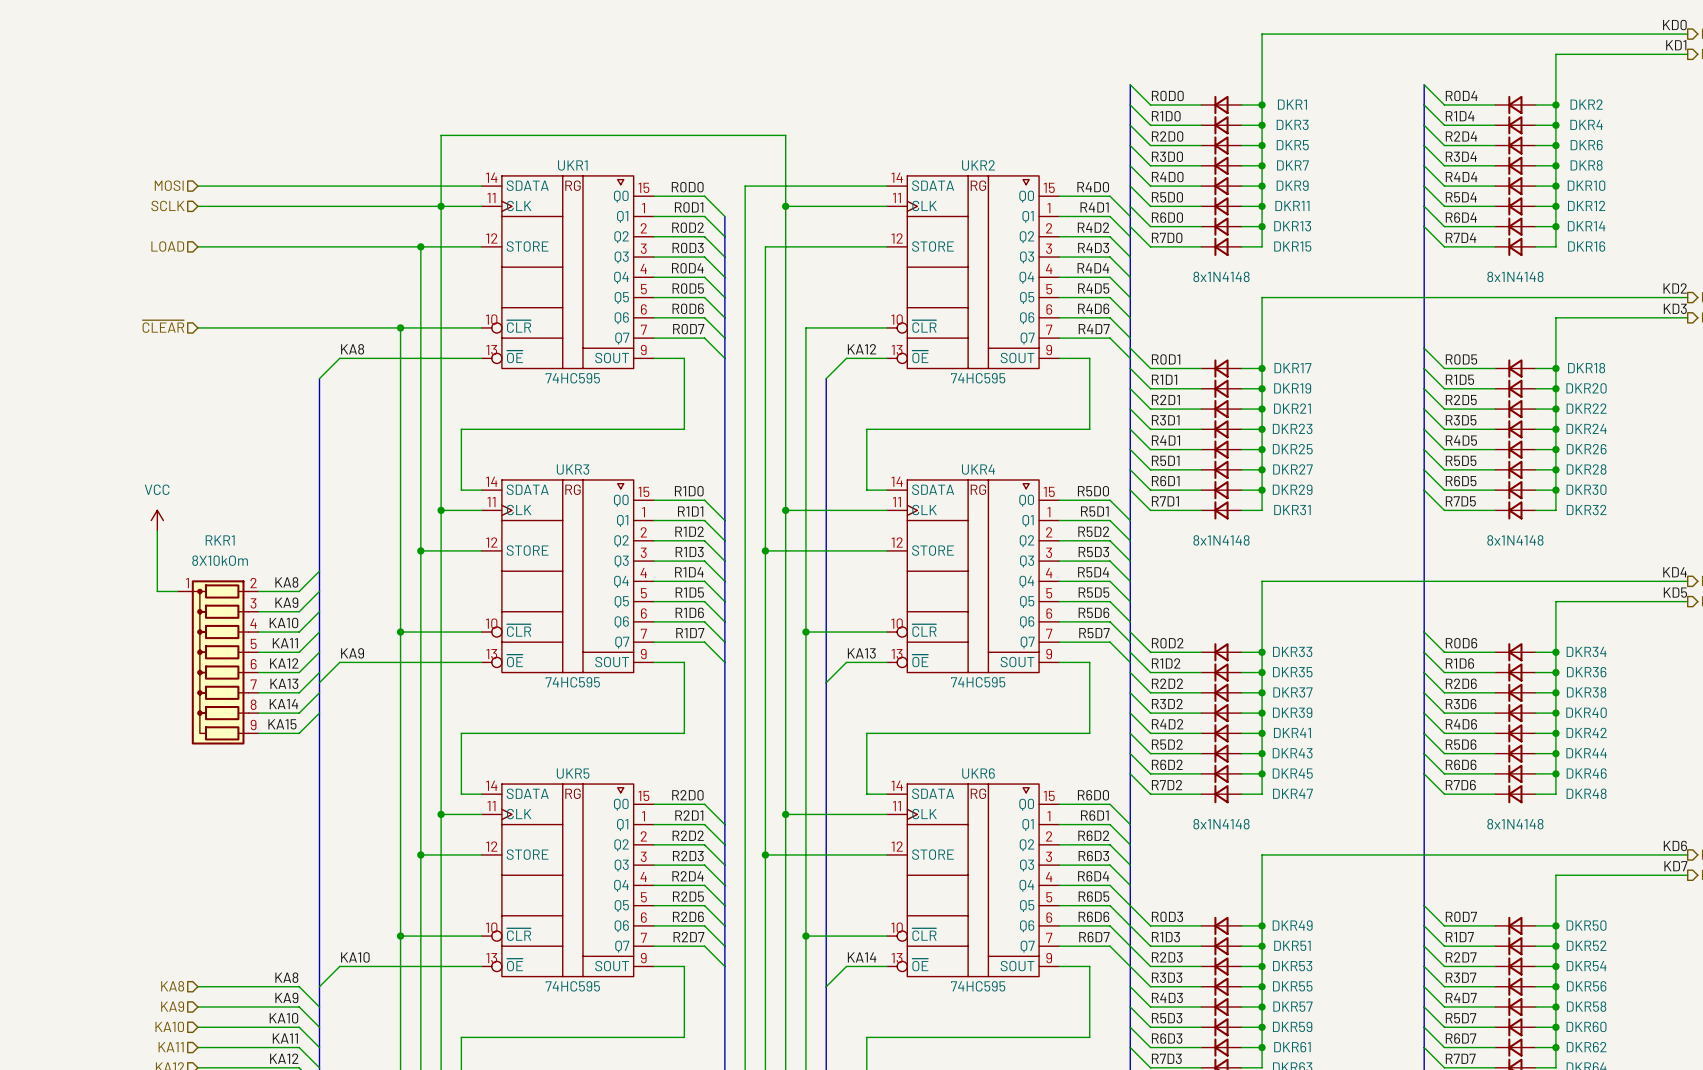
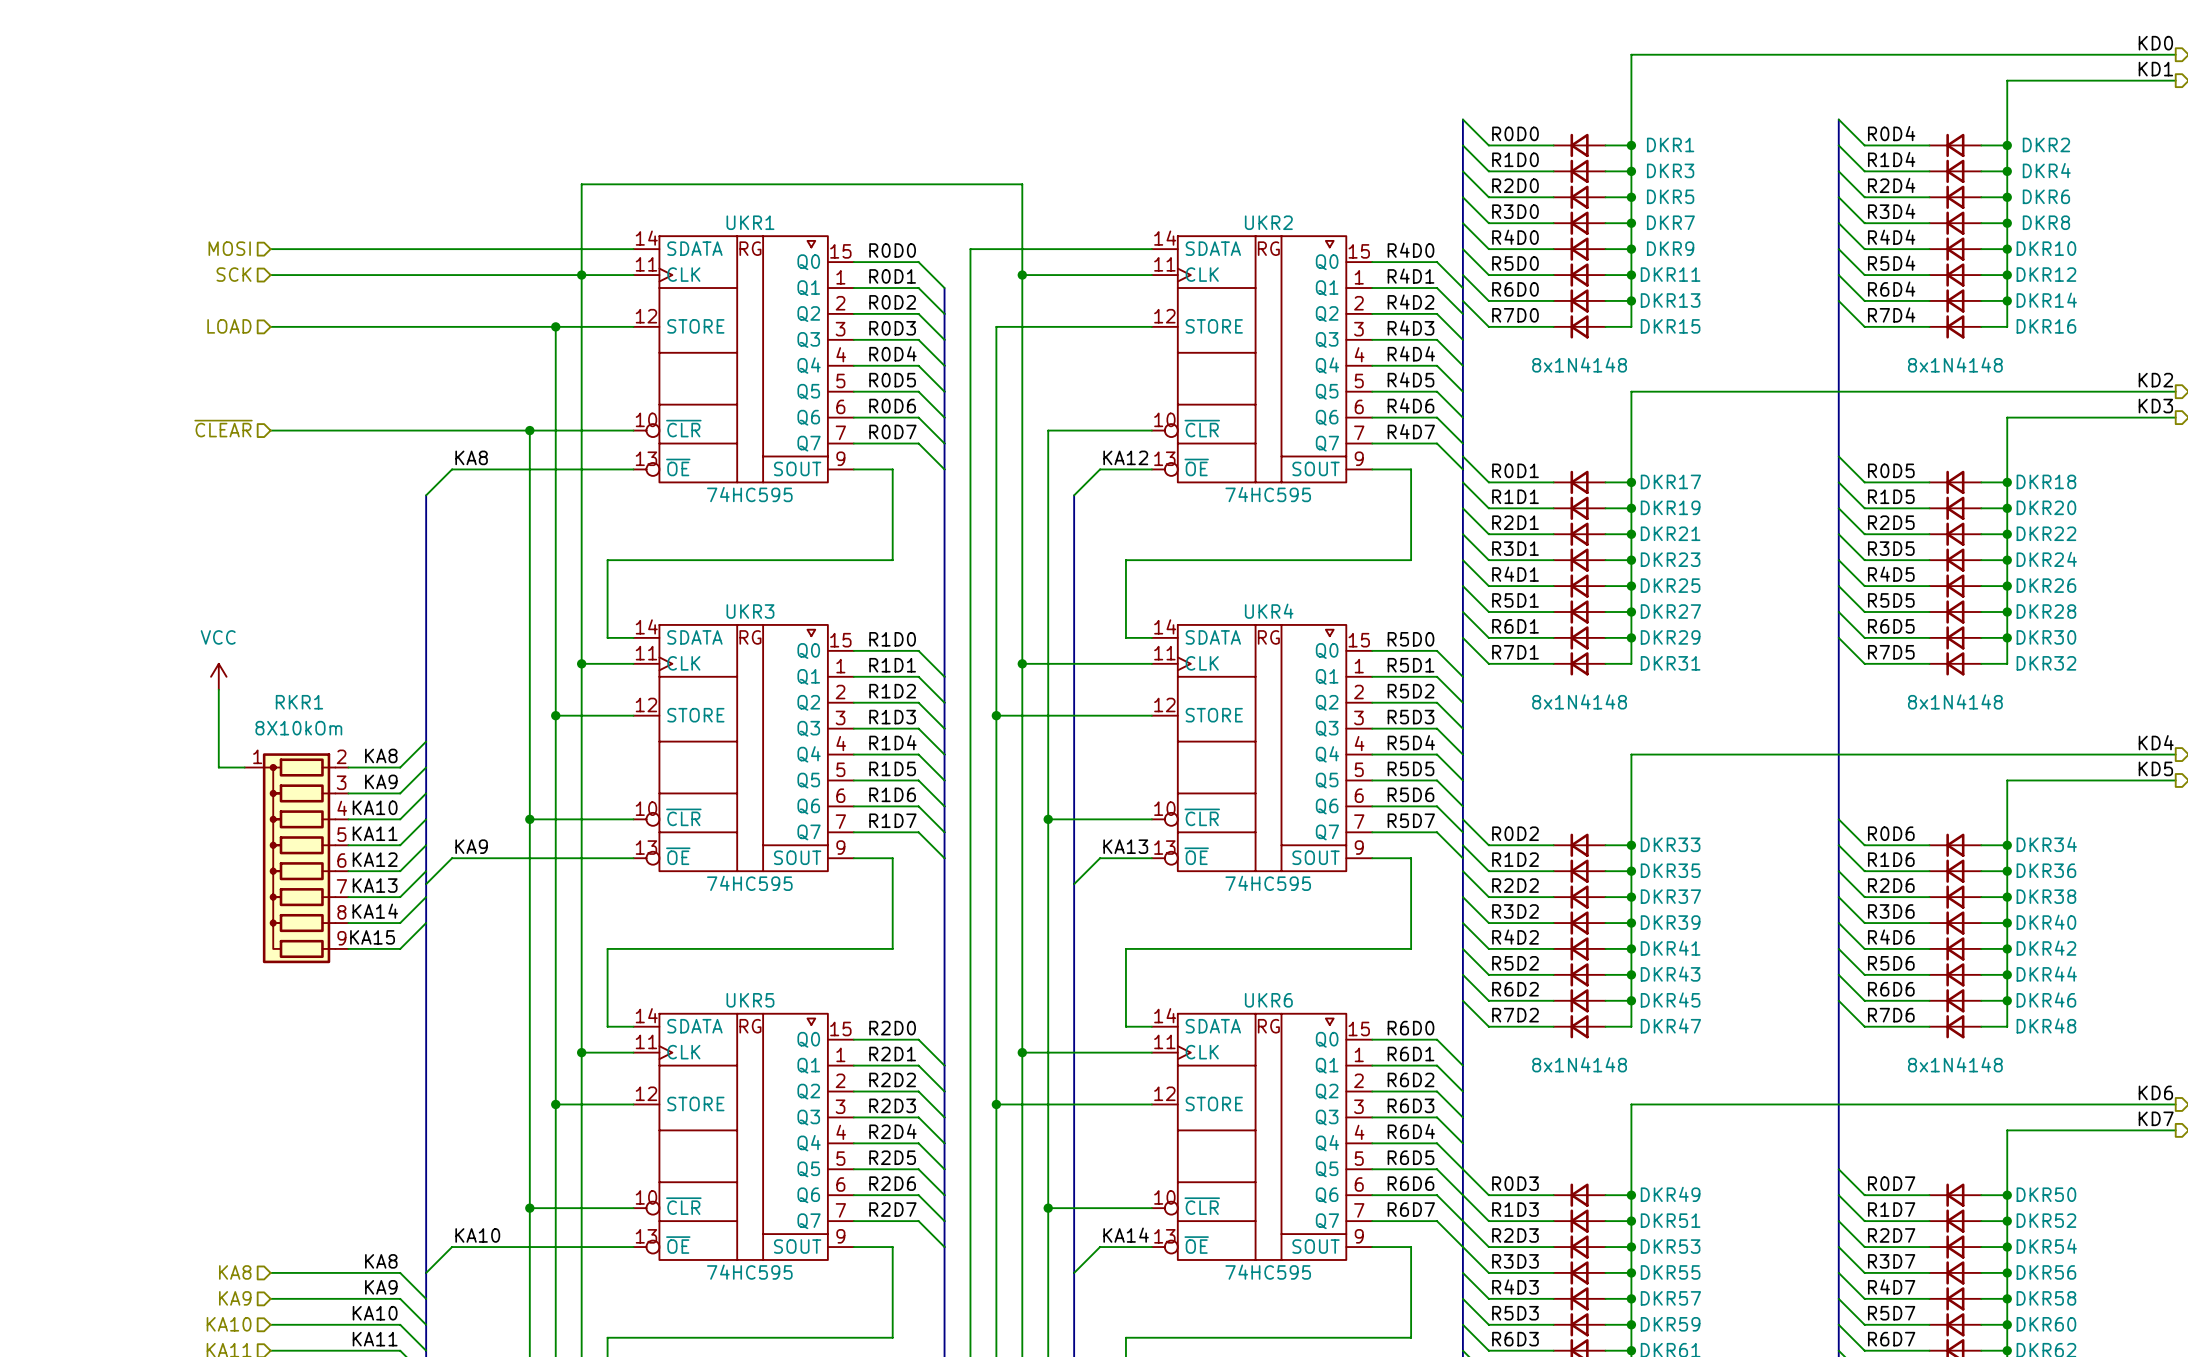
hierarchical label: SCLK (168, 205) -> SCK (234, 274)

